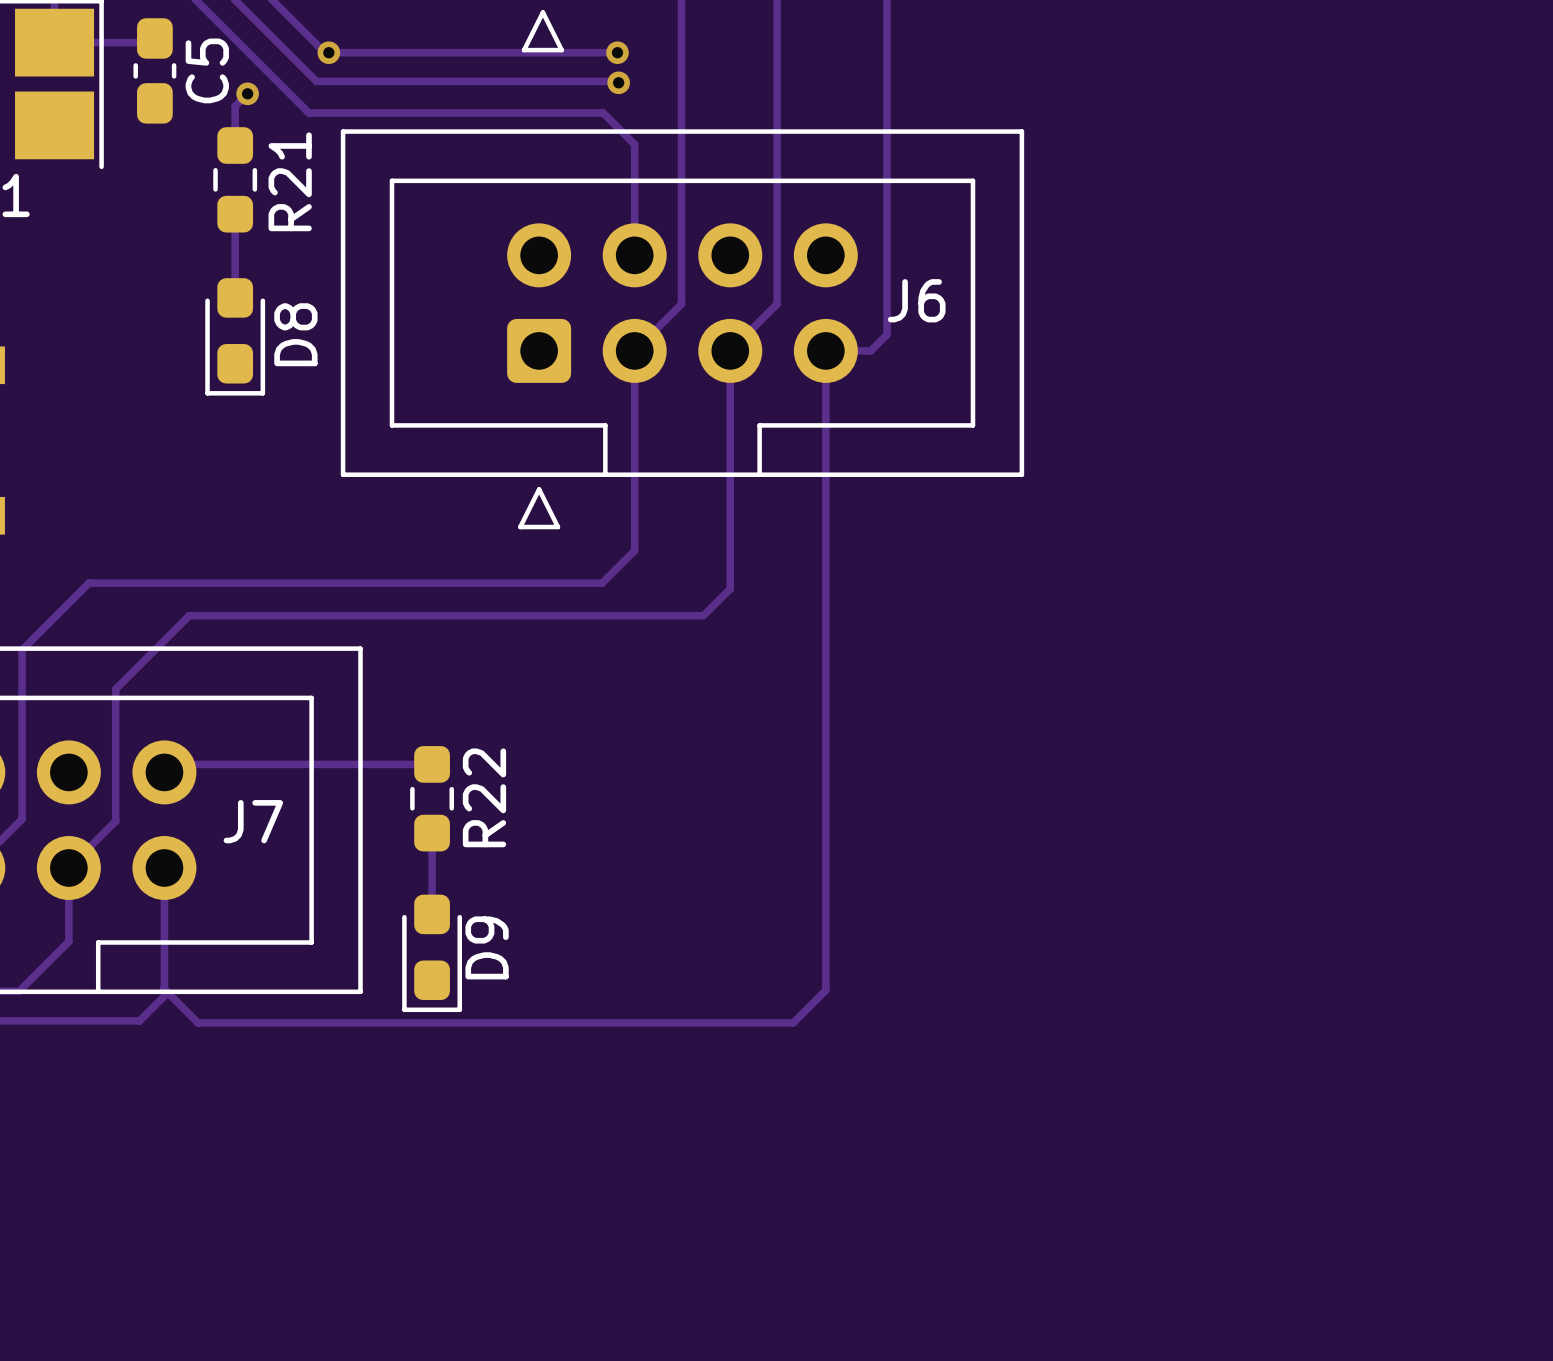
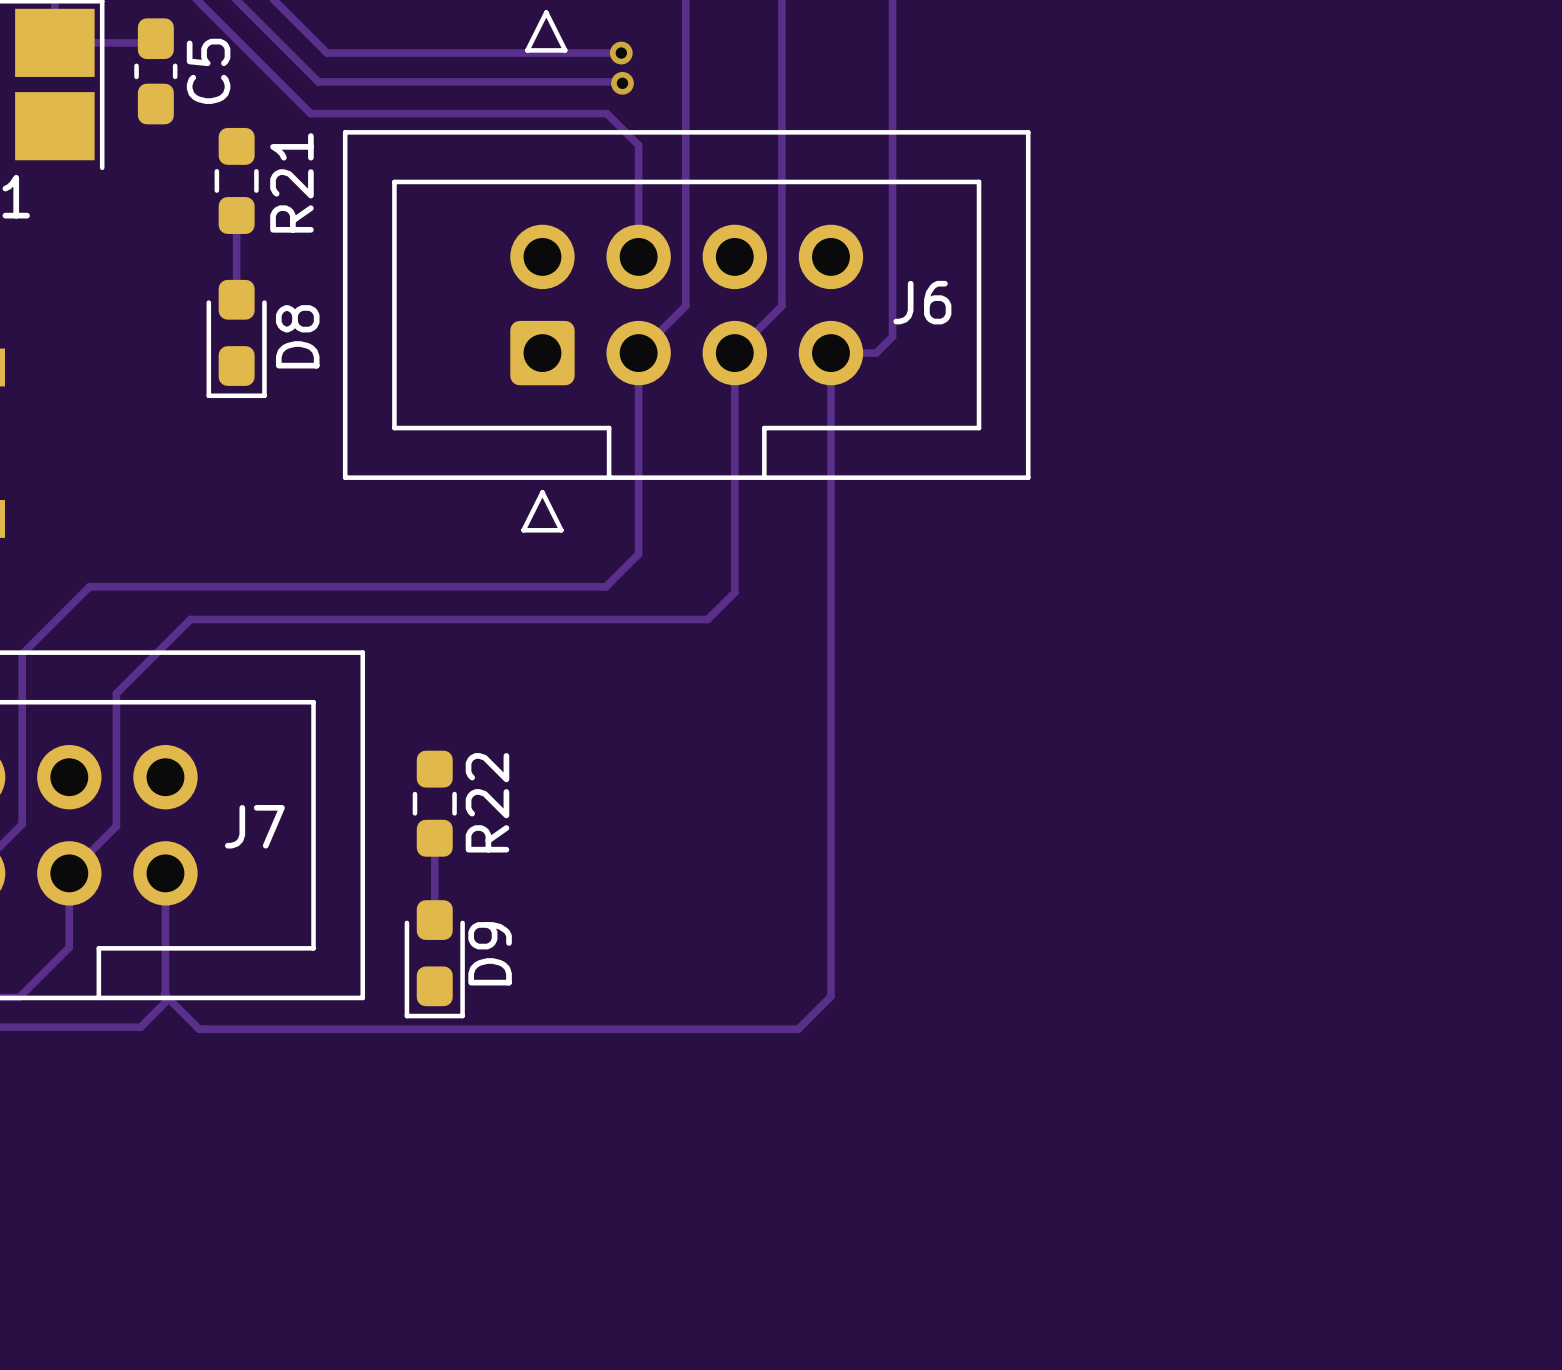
via: (328, 52) -> none
track: (247, 93) (235, 106) (235, 145) -> none
via: (247, 93) -> none
track: (432, 764) (172, 764) (164, 772) -> none

